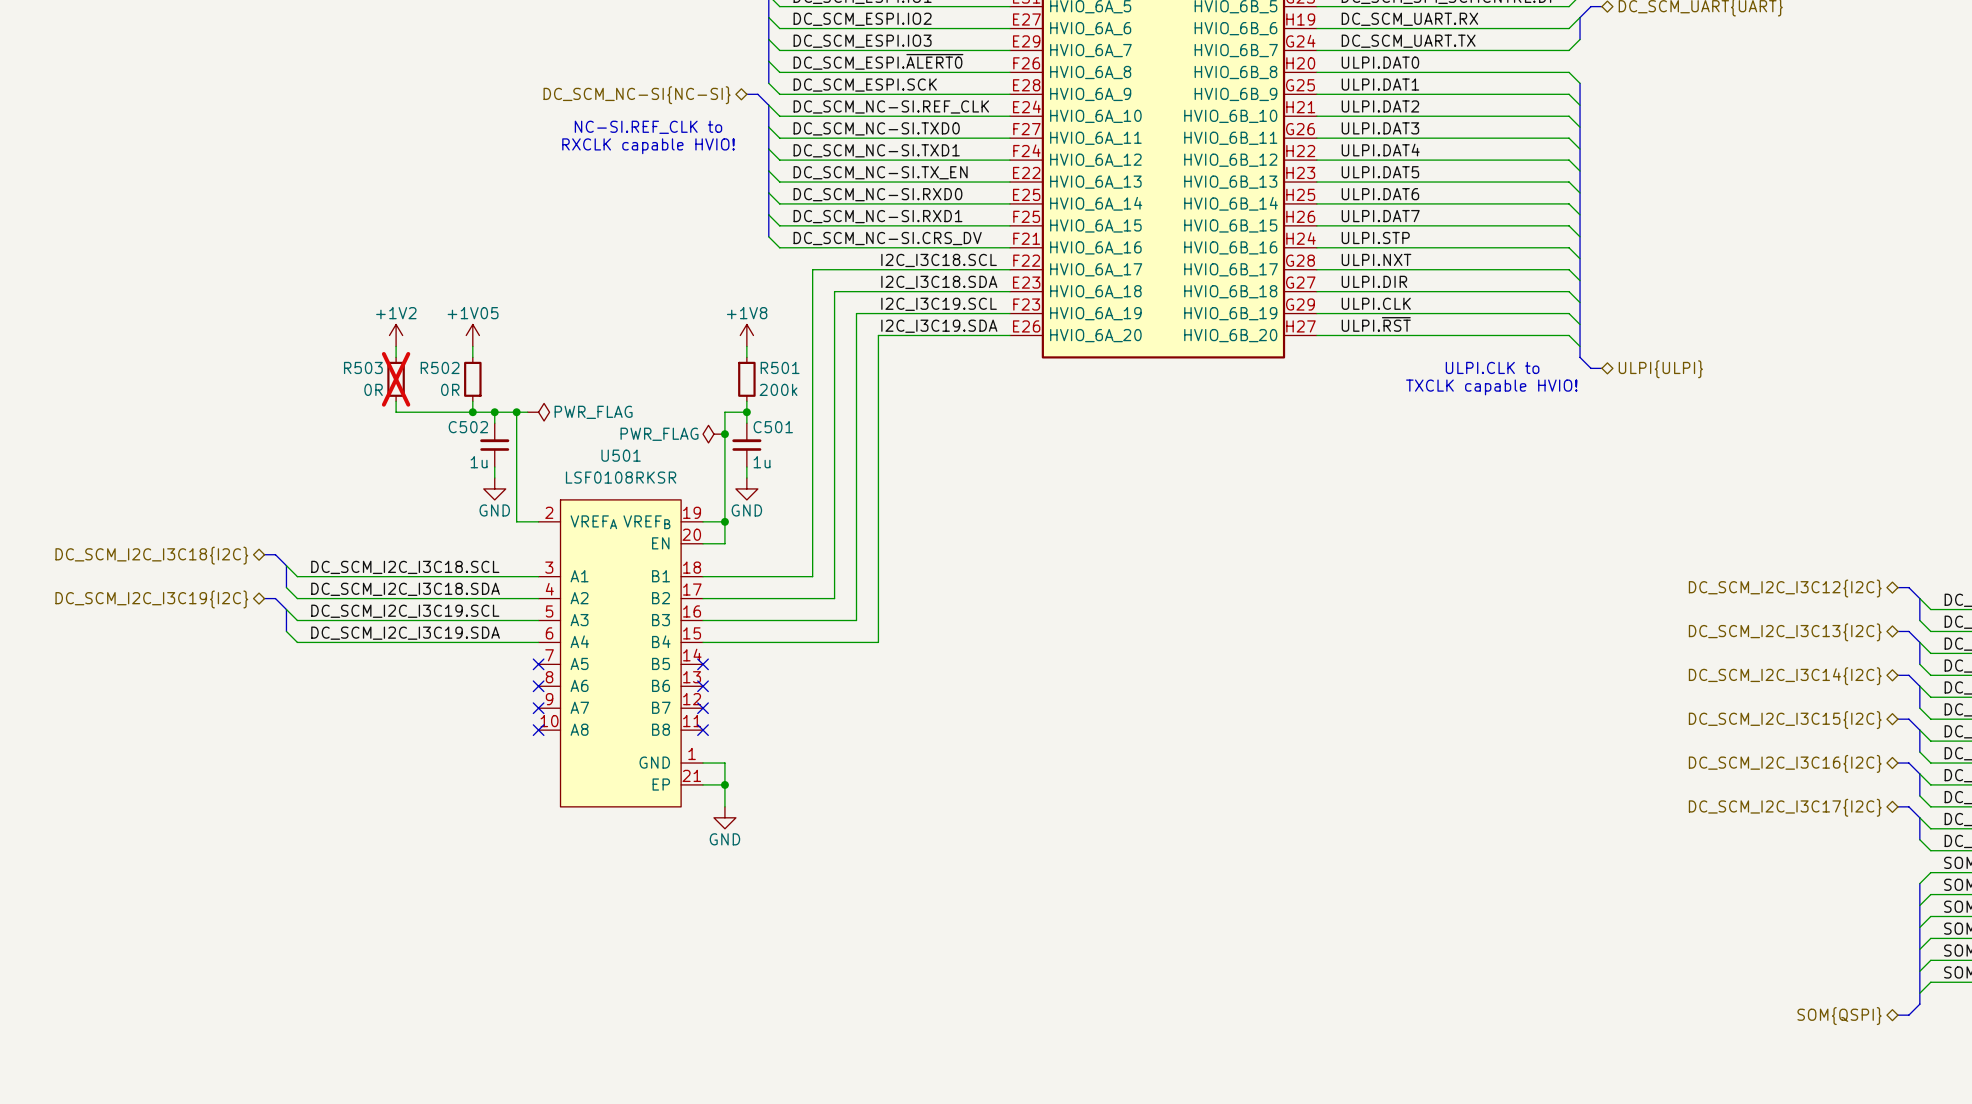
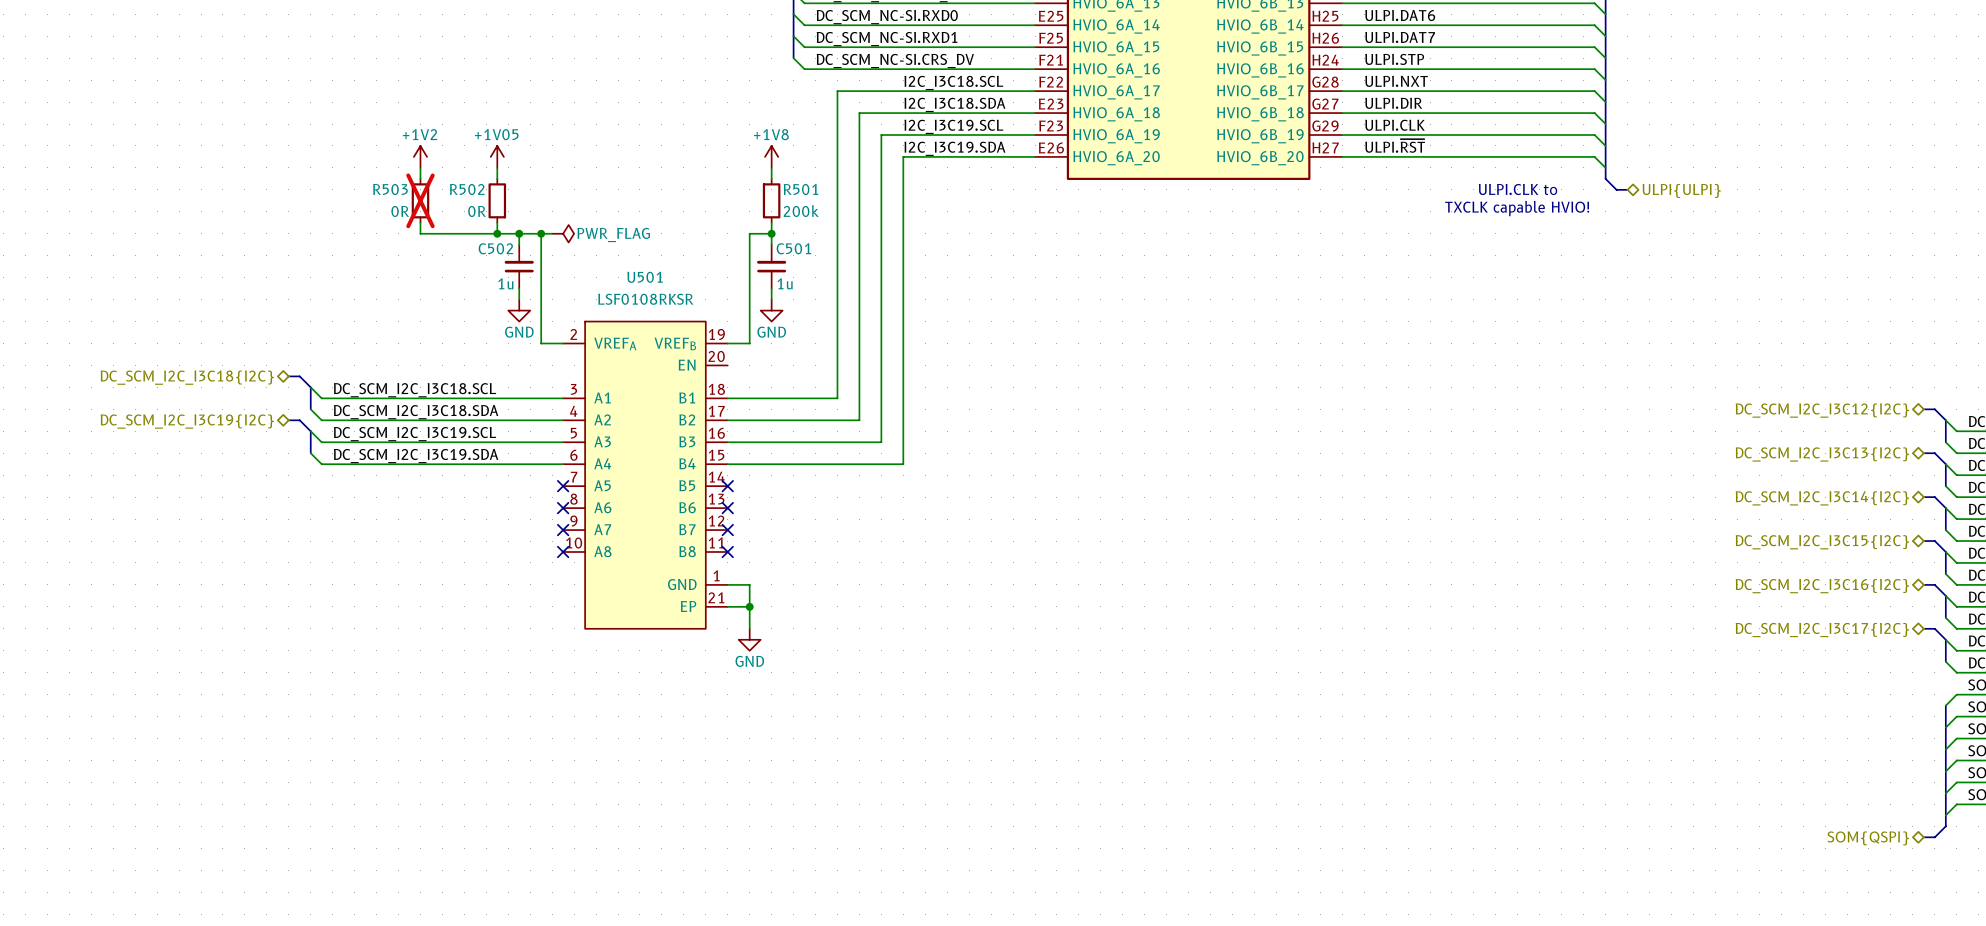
power symbol: PWR_FLAG (713, 434) -> none
junction: (724, 434) -> none
wire: (724, 521) (724, 543) (703, 543) -> none
junction: (724, 521) -> none

